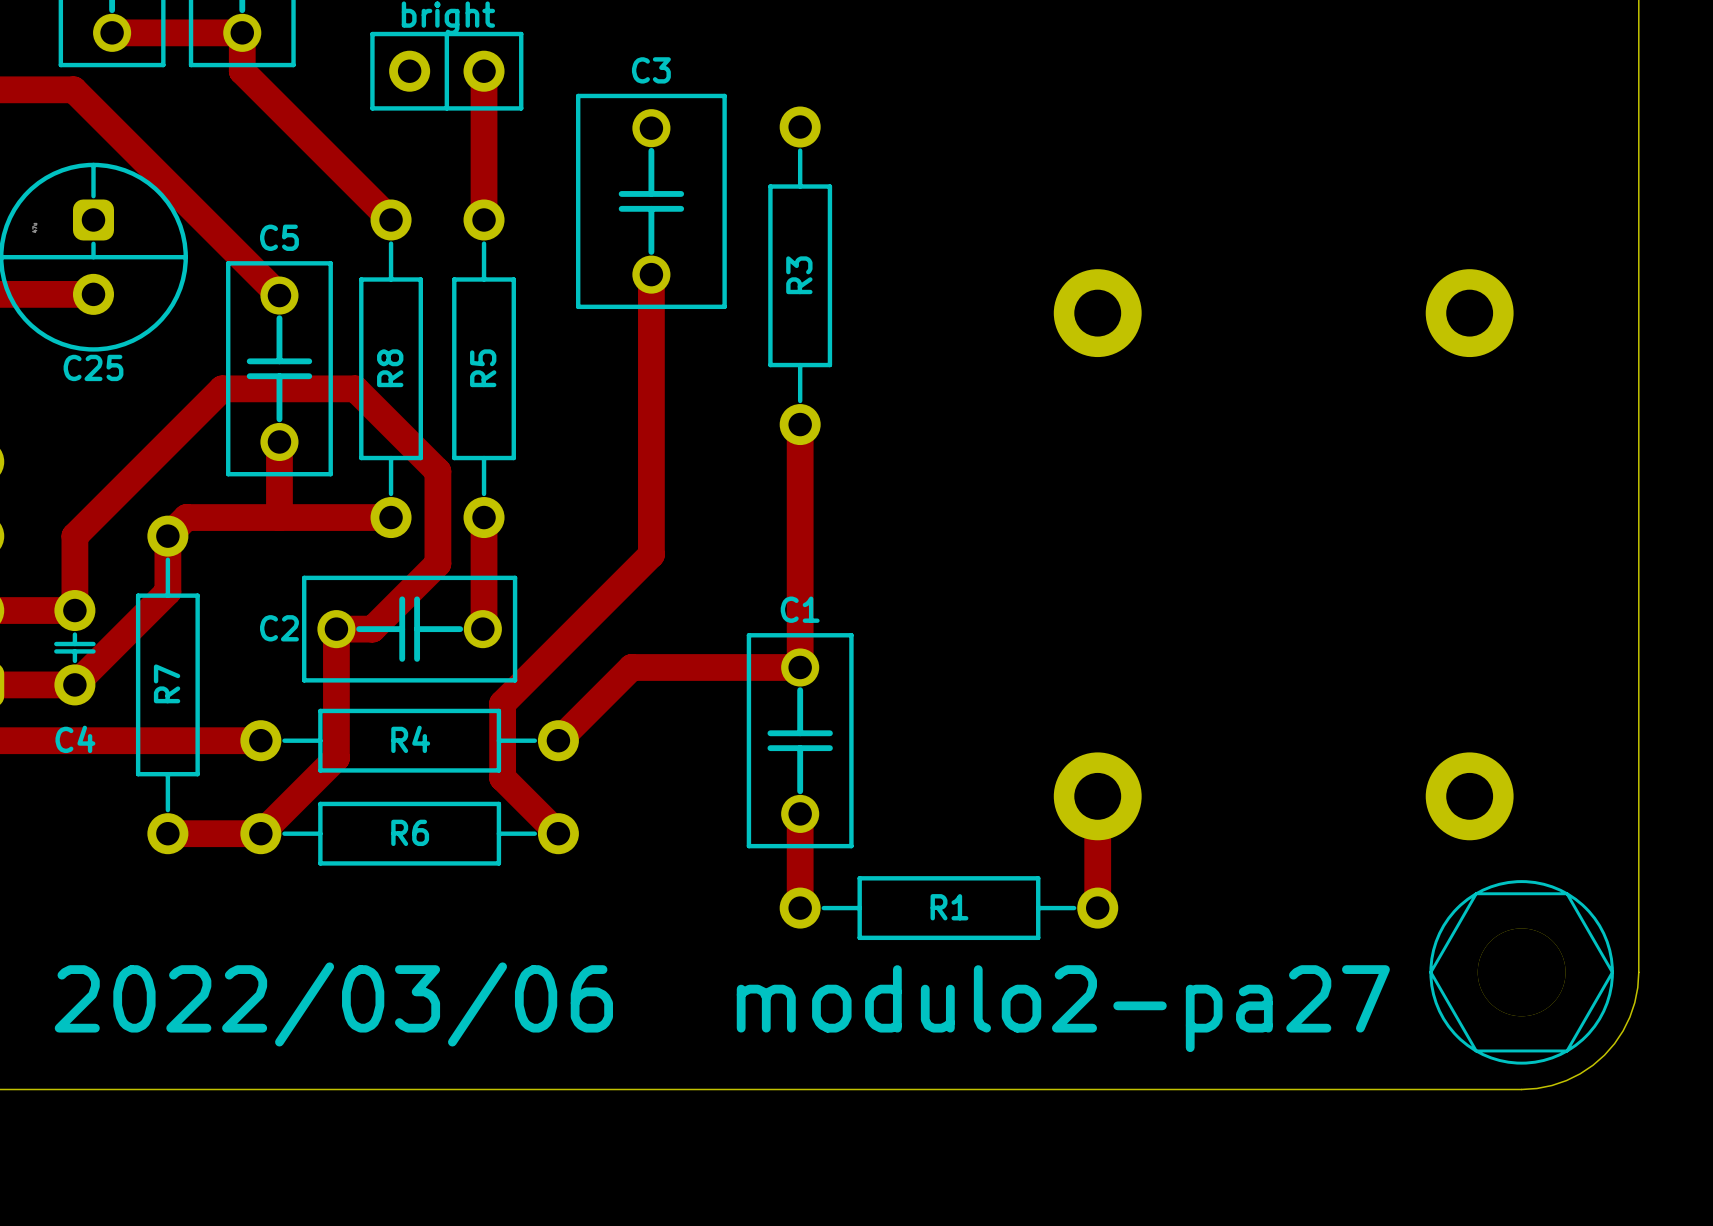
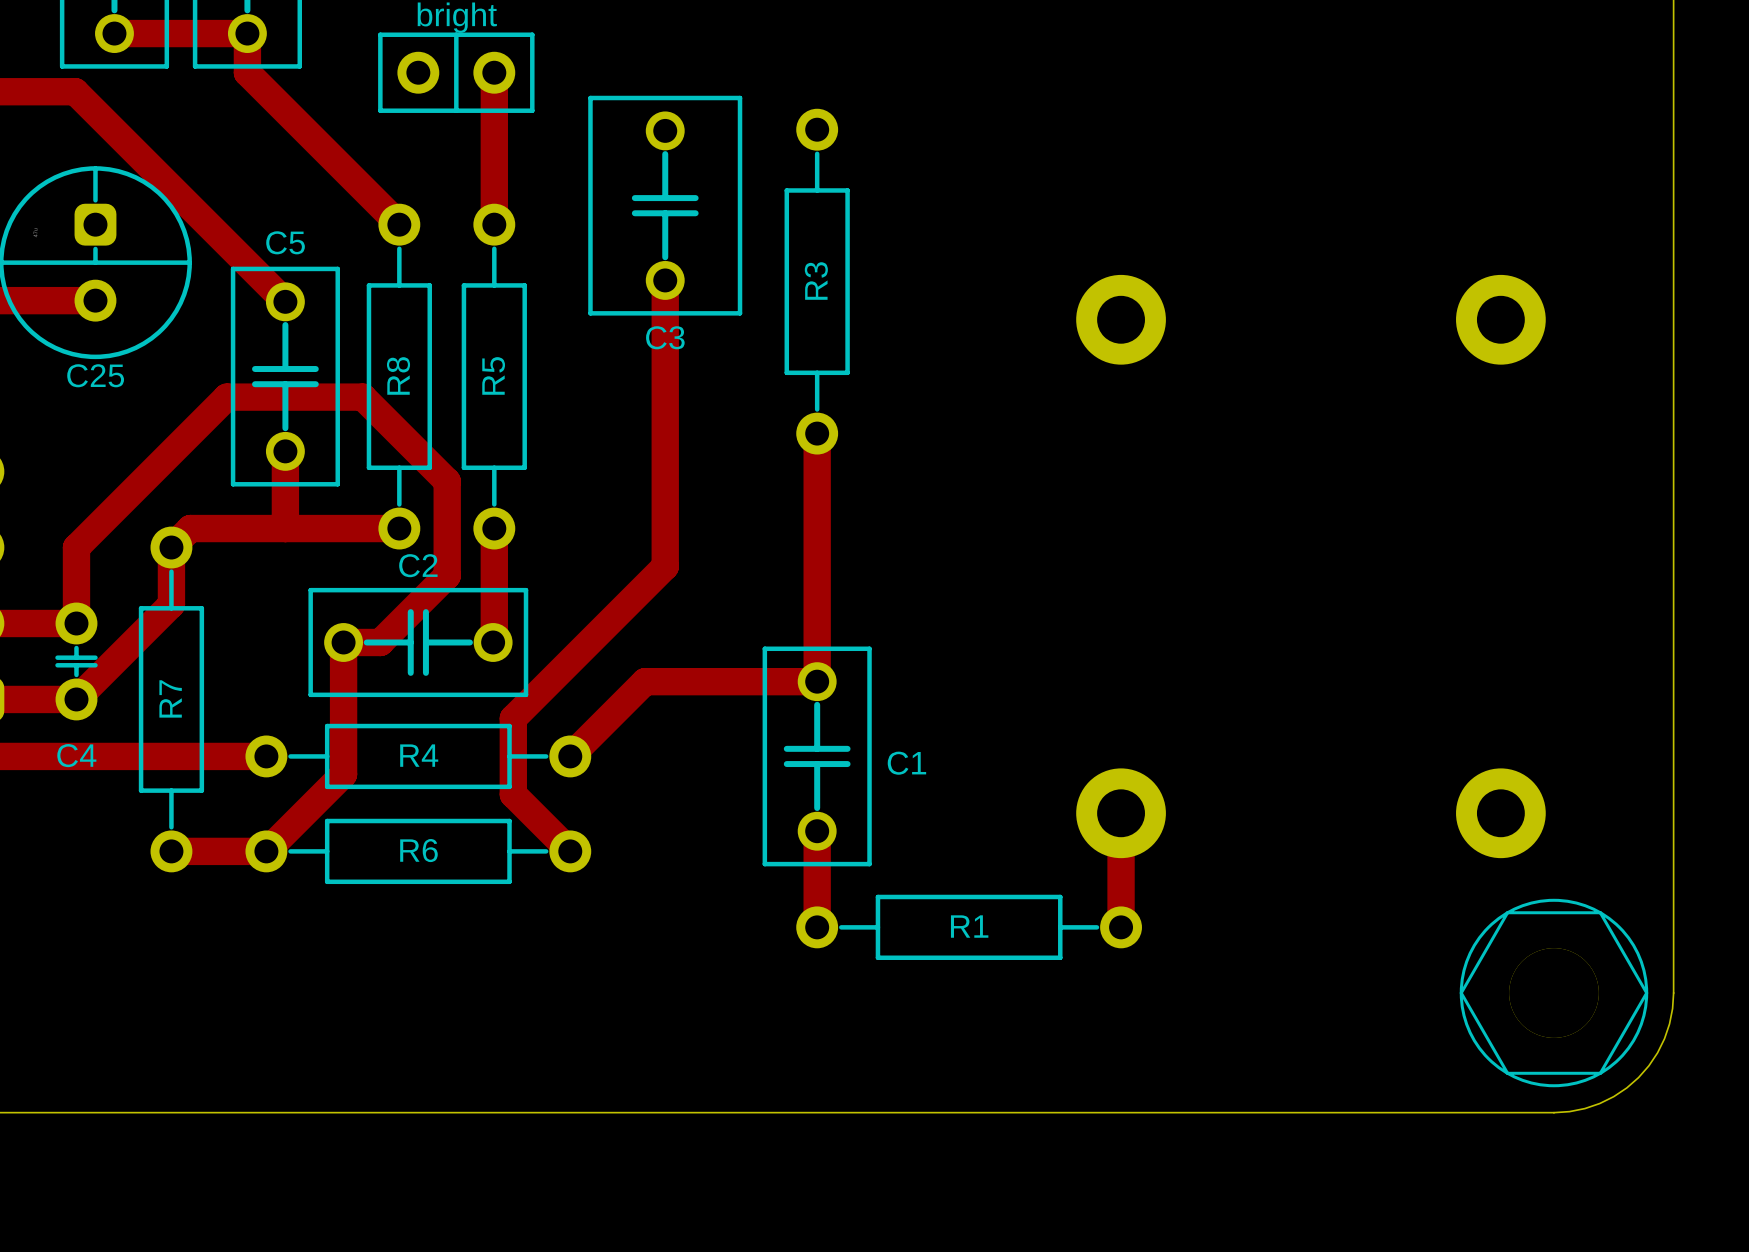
C3 name position: C3 (651, 70) -> C3 (665, 337)
C1 name position: C1 (800, 609) -> C1 (906, 763)
C2 name position: C2 (279, 628) -> C2 (418, 565)
text: 2022/03/06 (333, 1004) -> none
text: modulo2-pa27 (1063, 1008) -> none

